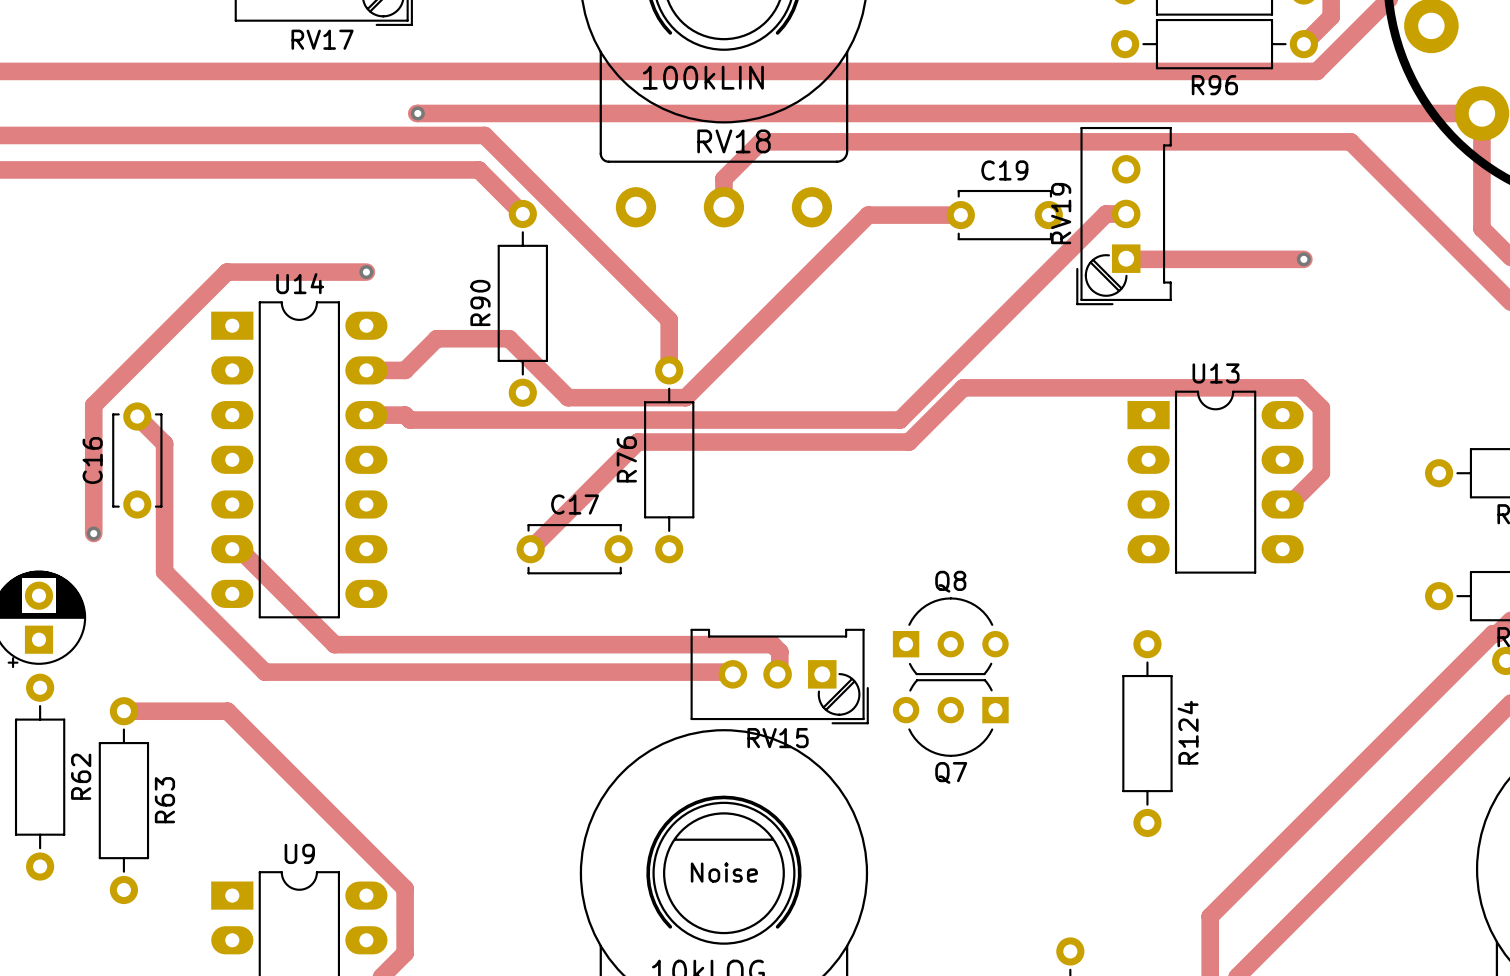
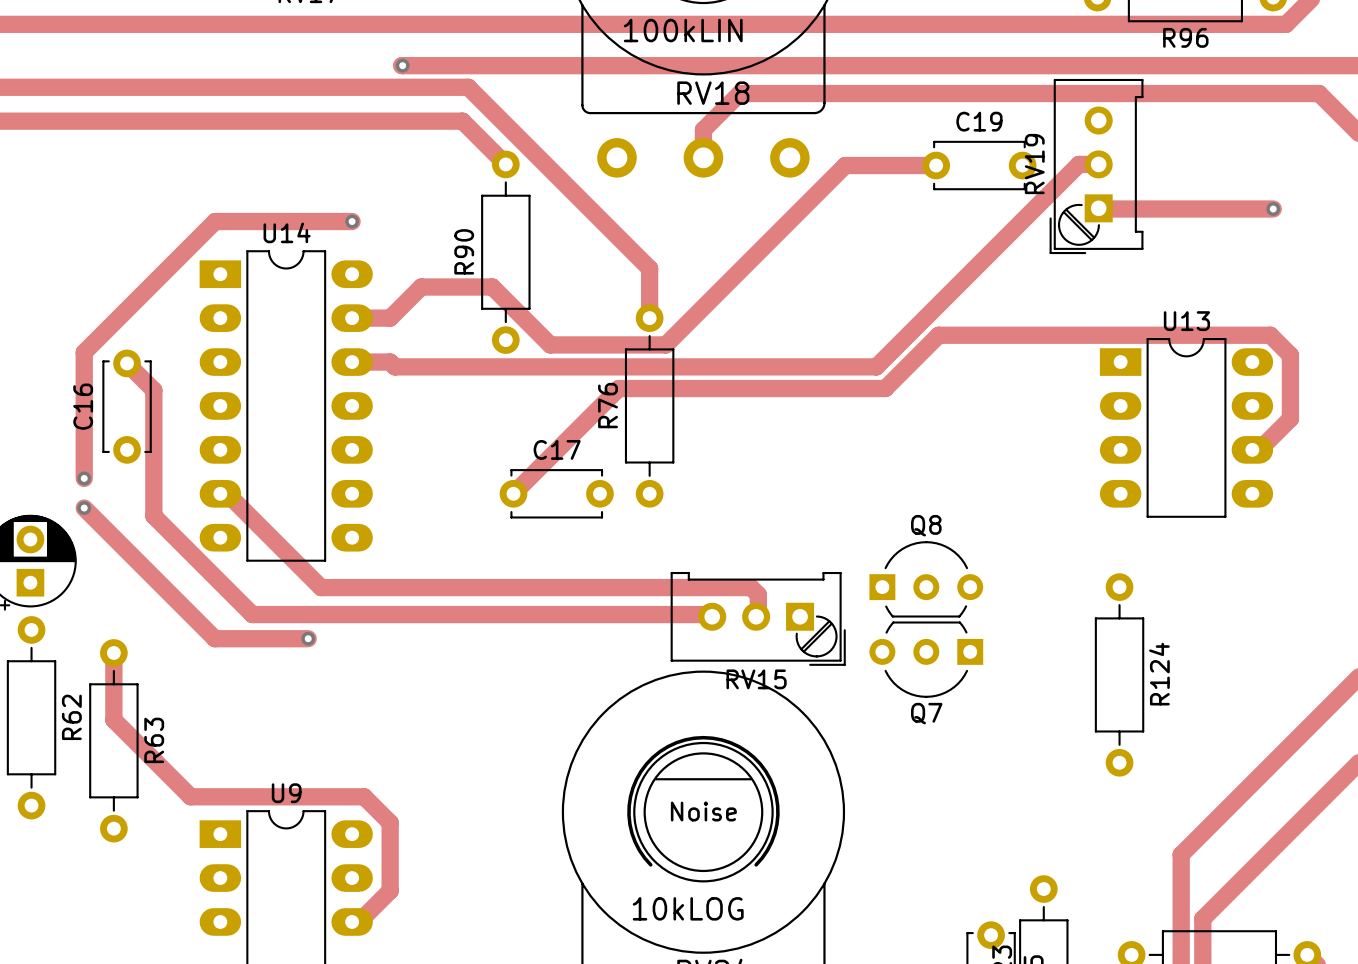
track: none -> (84, 508) (214, 638) (308, 638)
via: none -> (84, 508)
via: none -> (308, 638)
track: (123, 711) (227, 711) (405, 888) -> (113, 652) (113, 719) (190, 796) (364, 796) (390, 822) (390, 827)

